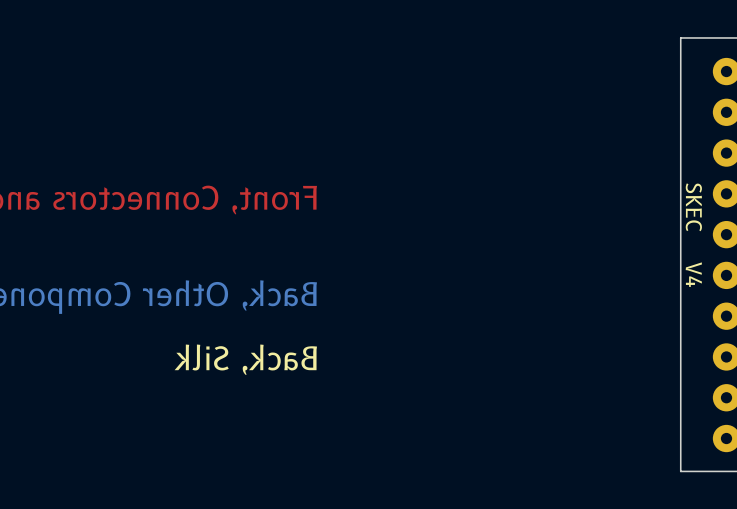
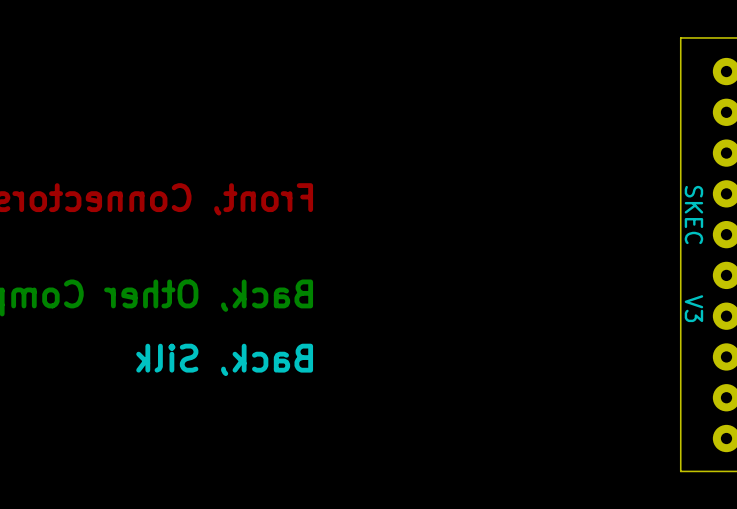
text: SKEC V4 (693, 235) -> SKEC V3 (693, 253)

